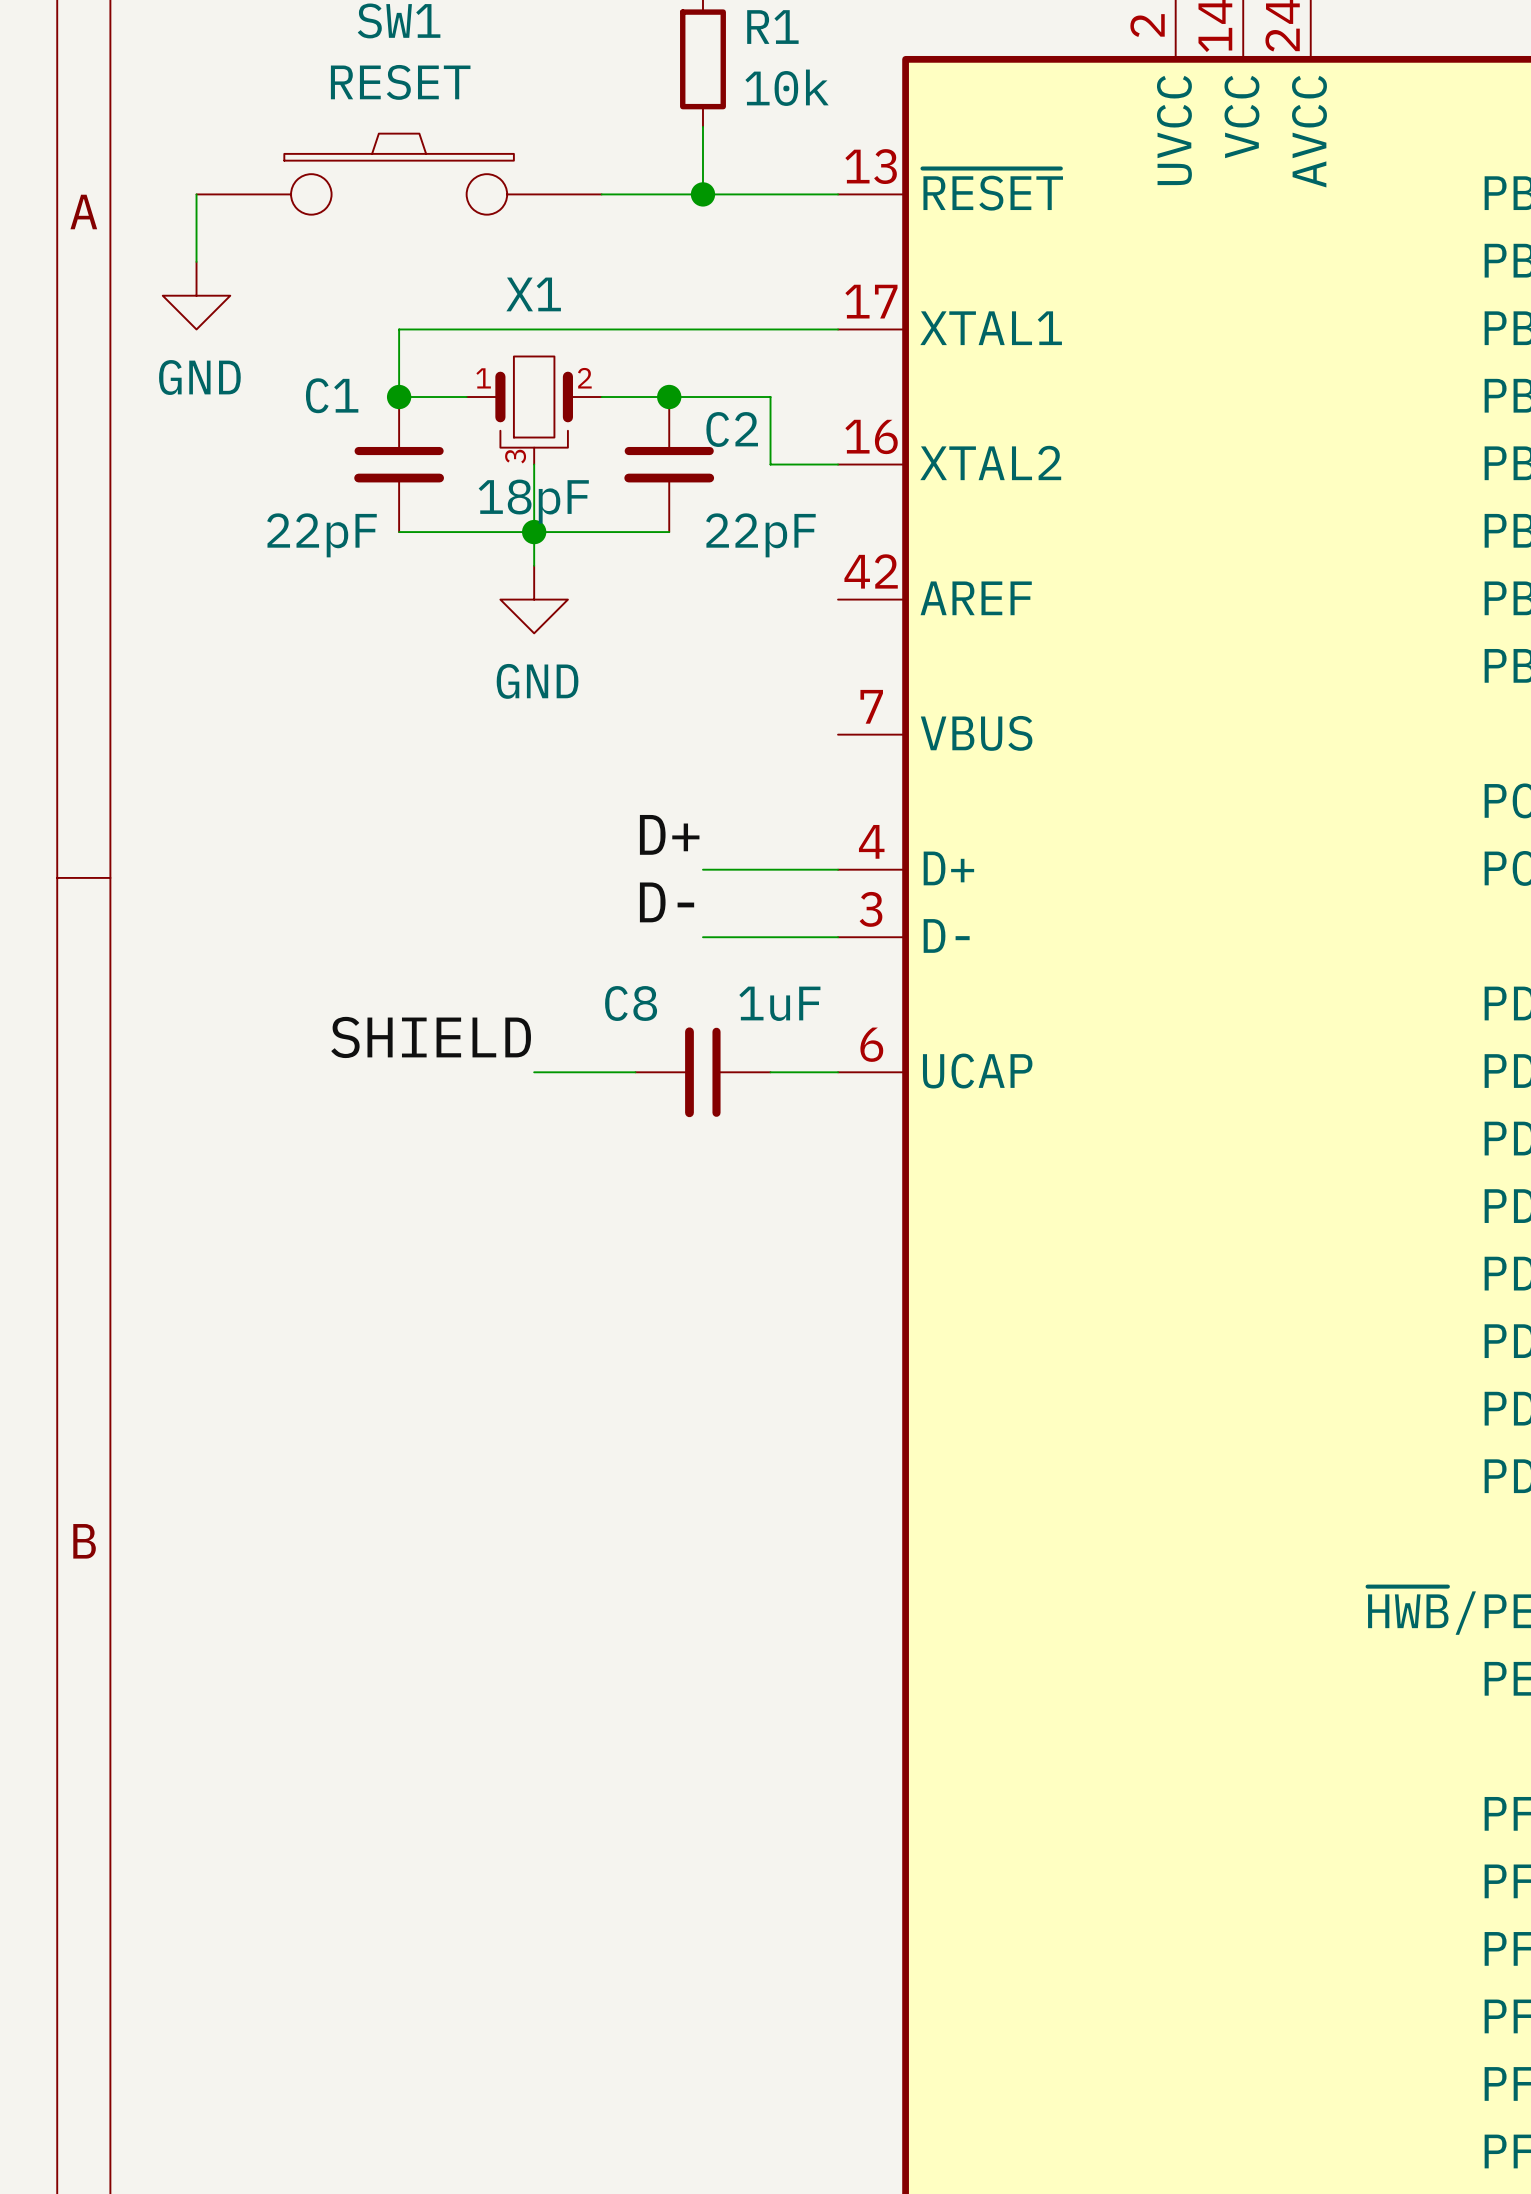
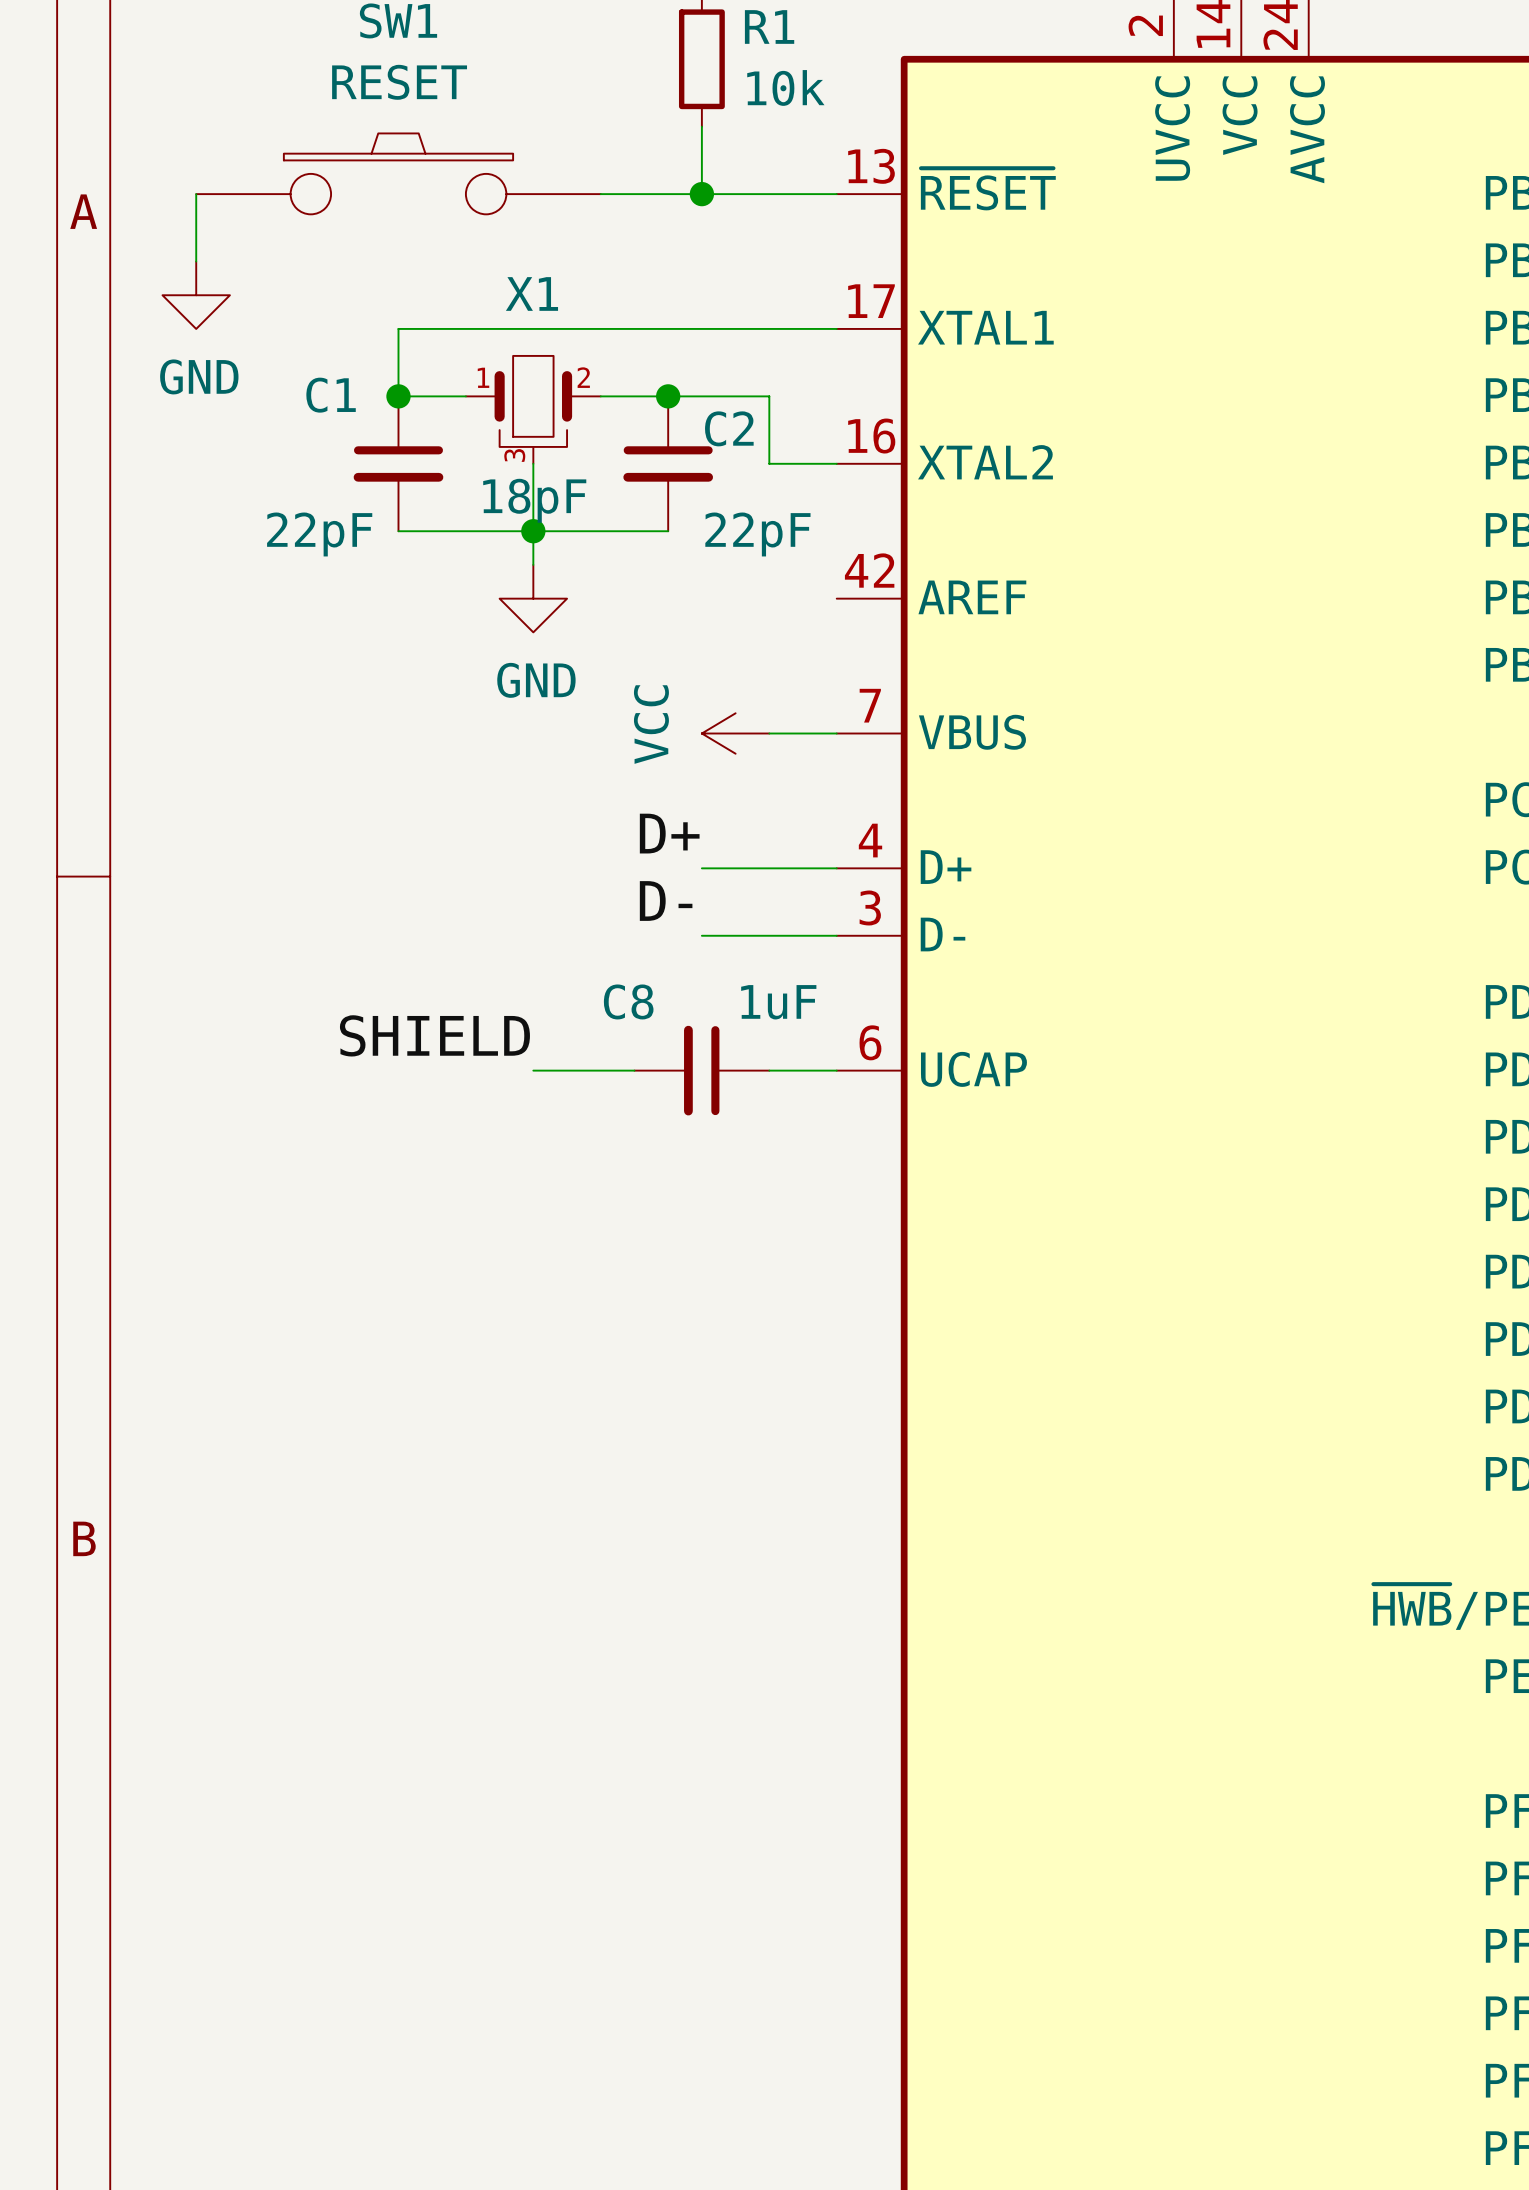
power symbol: none -> VCC (735, 733)
wire: none -> (769, 733) (836, 733)

